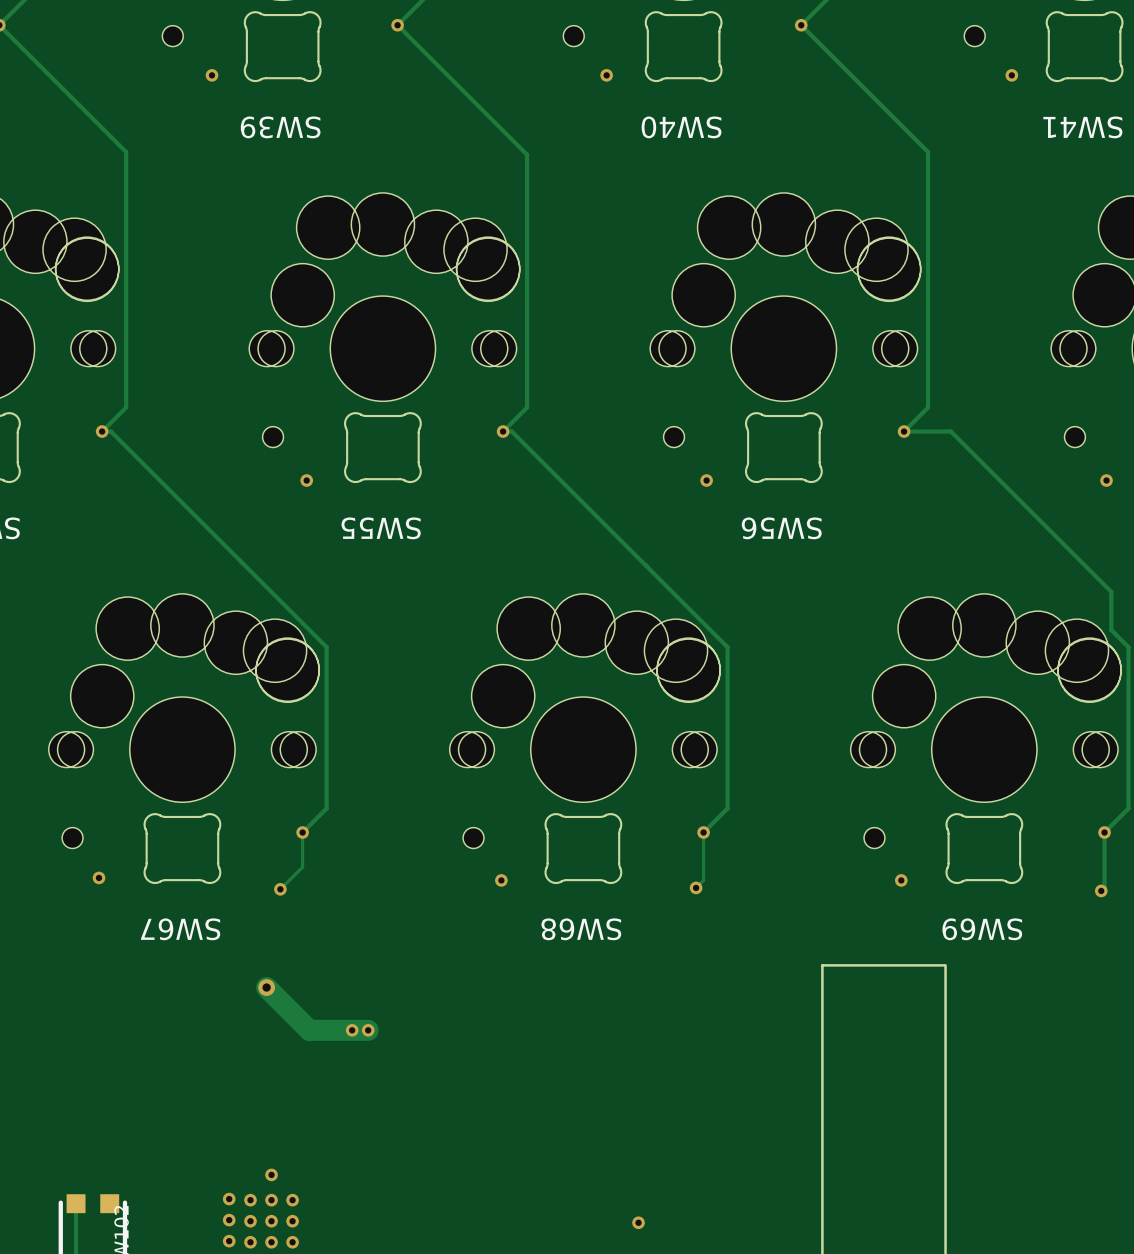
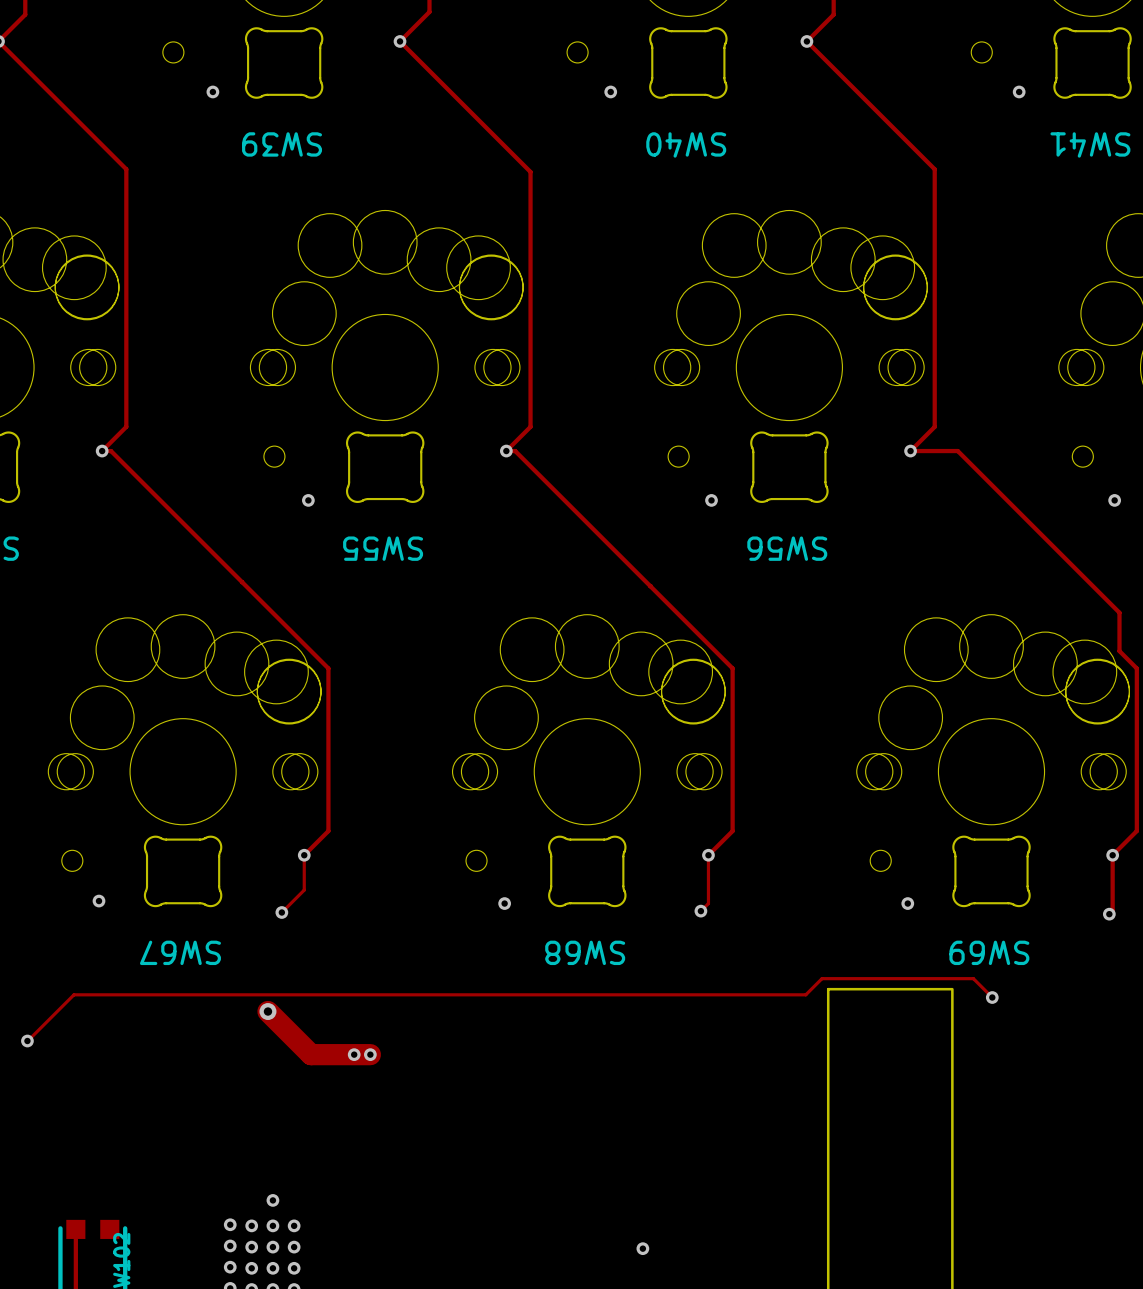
track: none -> (992, 997) (973, 978) (821, 978) (805, 994) (73, 994) (27, 1041)
via: none -> (992, 997)
via: none -> (27, 1041)

